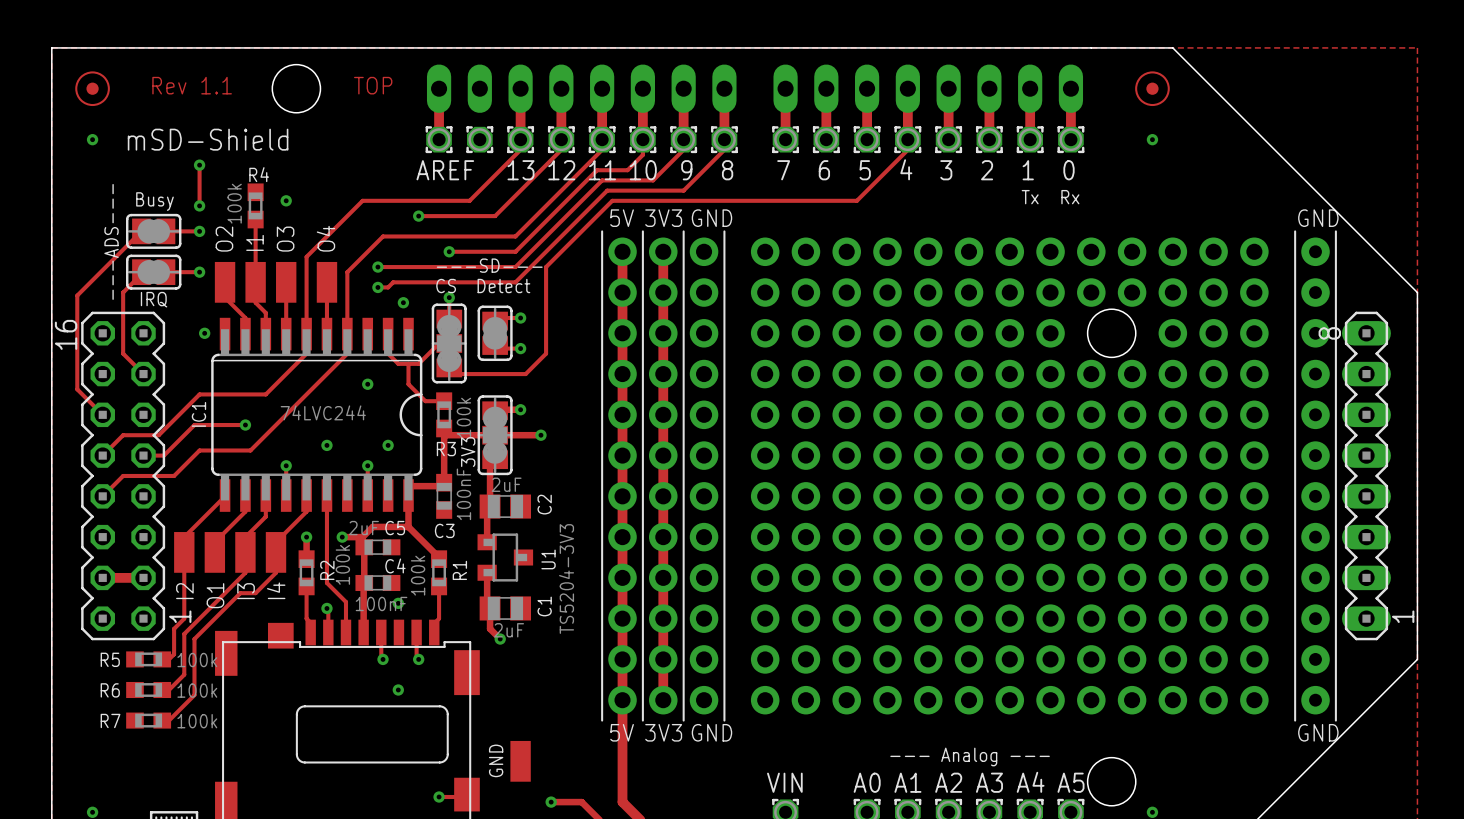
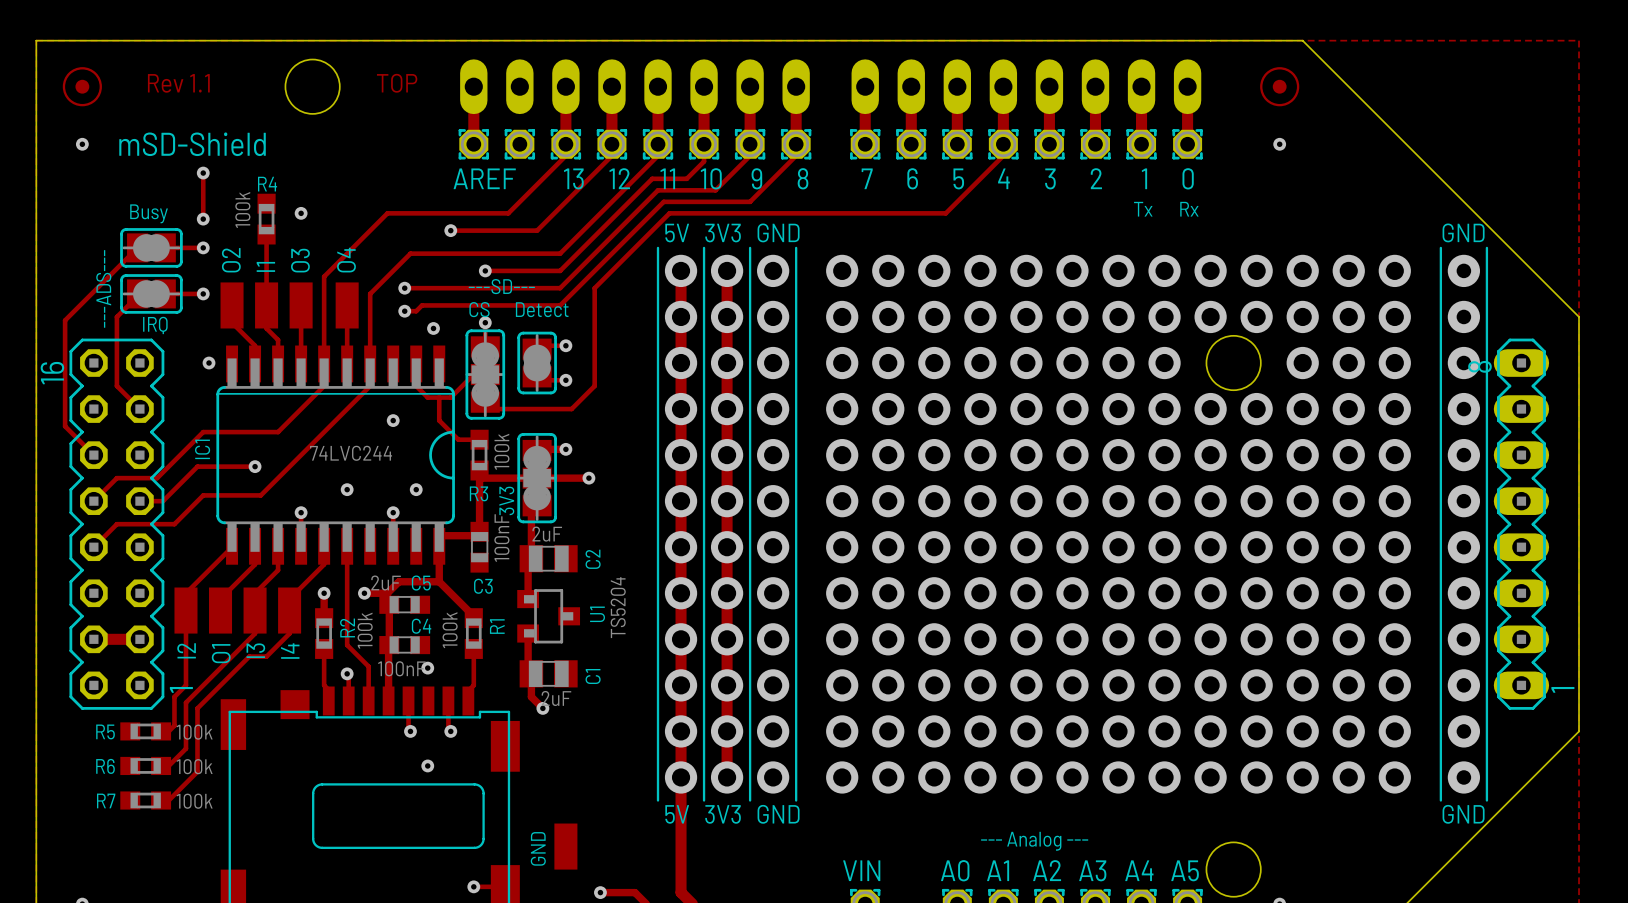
U1 value: TS5204-3V3 (566, 578) -> TS5204 (618, 607)

